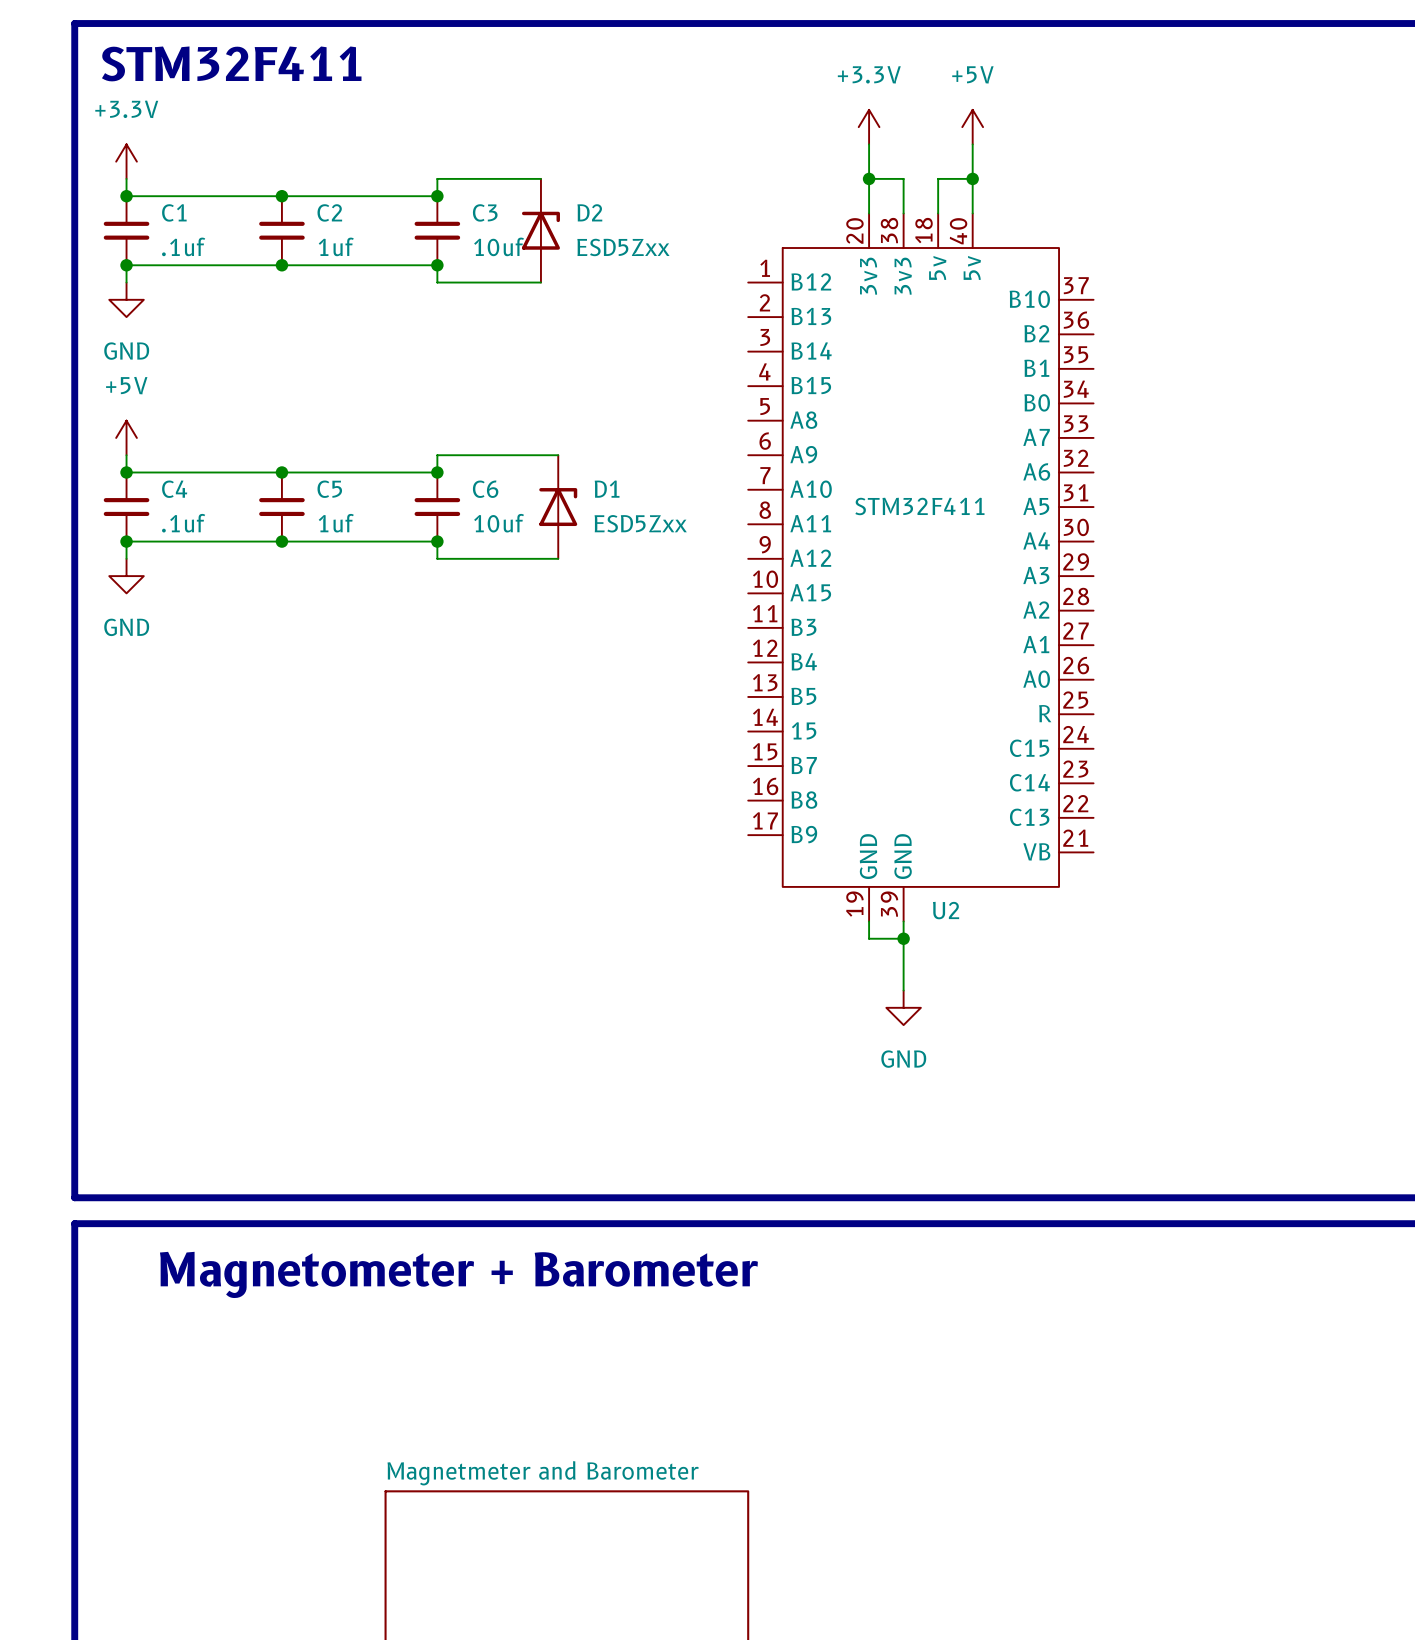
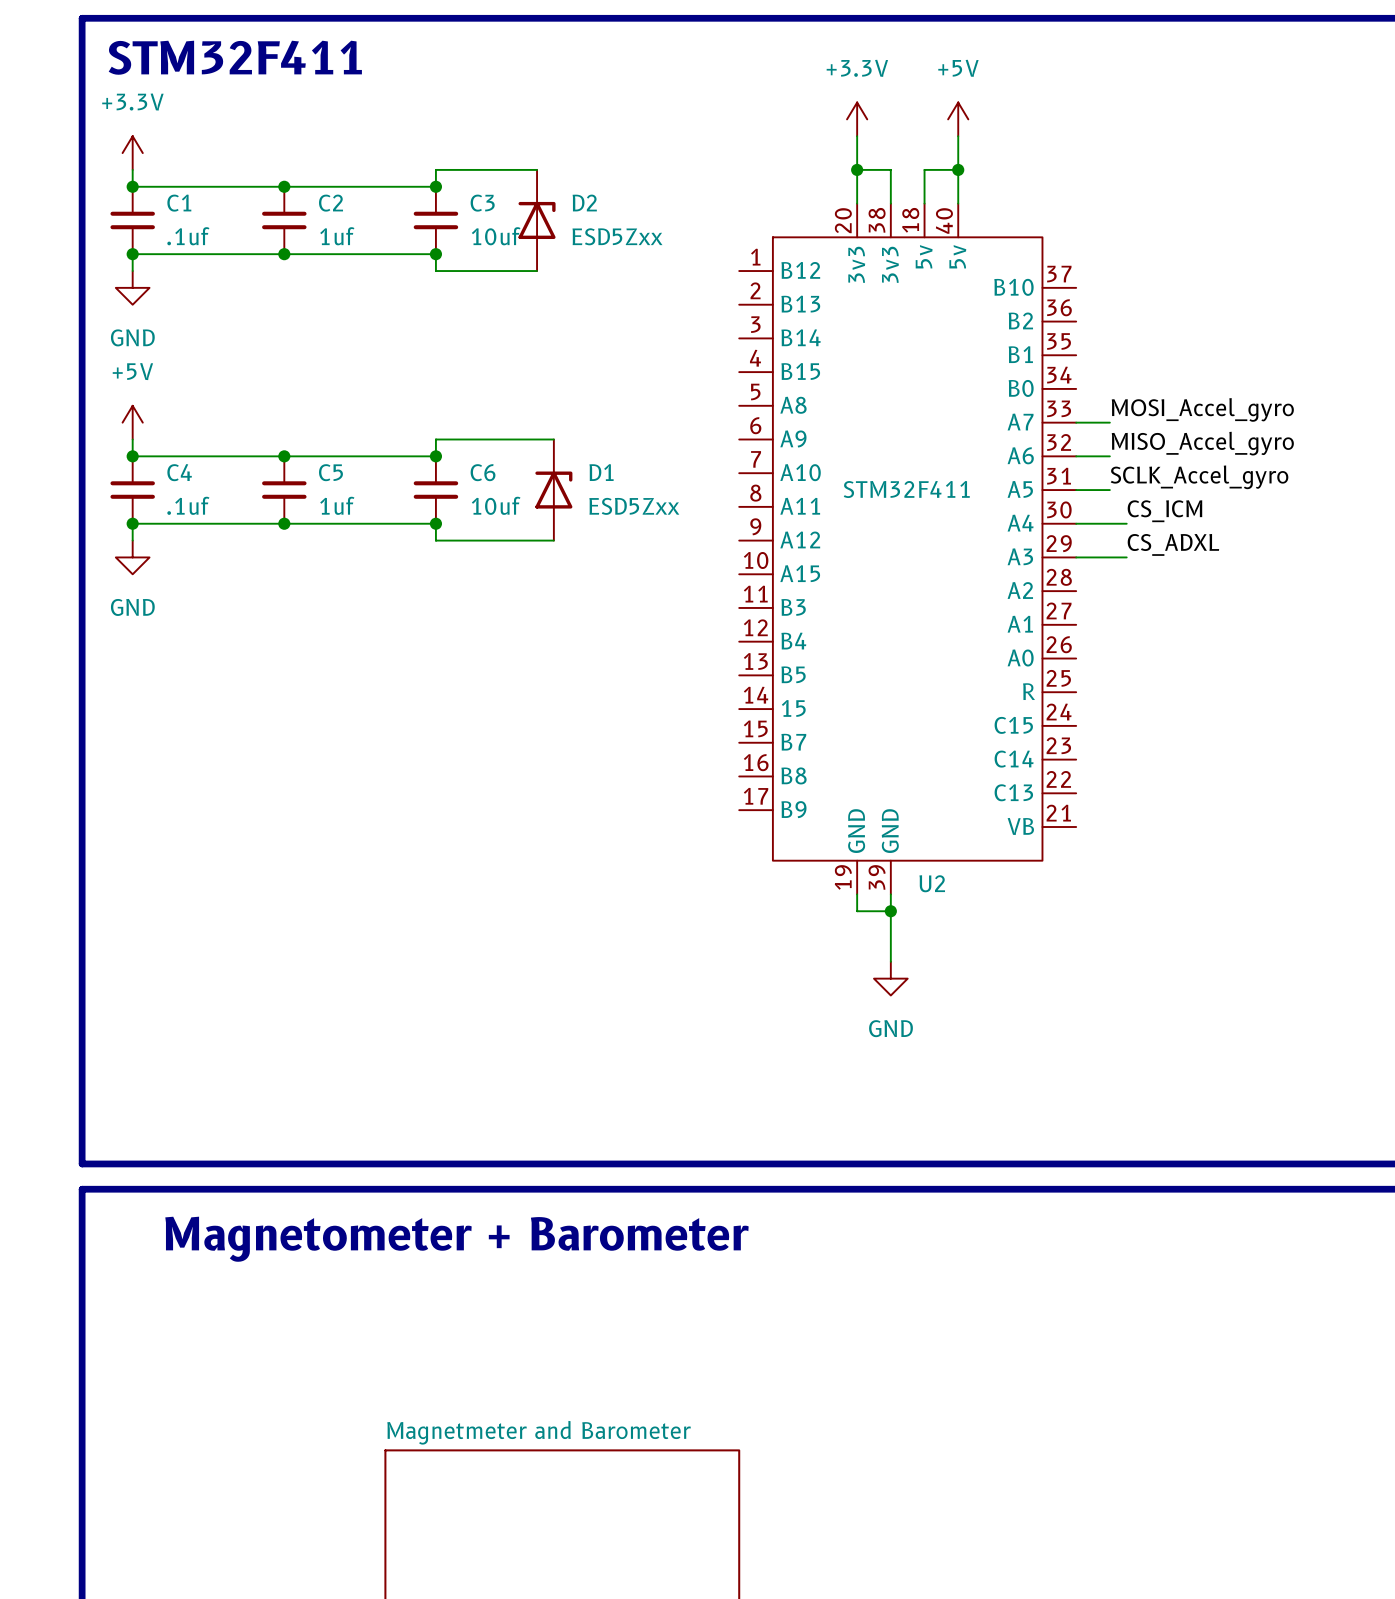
label: none -> MOSI_Accel_gyro (1202, 409)
wire: none -> (1076, 422) (1109, 422)
label: none -> MISO_Accel_gyro (1202, 443)
wire: none -> (1076, 456) (1109, 456)
label: none -> SCLK_Accel_gyro (1199, 477)
wire: none -> (1076, 490) (1109, 490)
label: none -> CS_ICM (1164, 511)
wire: none -> (1076, 523) (1126, 523)
label: none -> CS_ADXL (1173, 544)
wire: none -> (1076, 557) (1126, 557)

